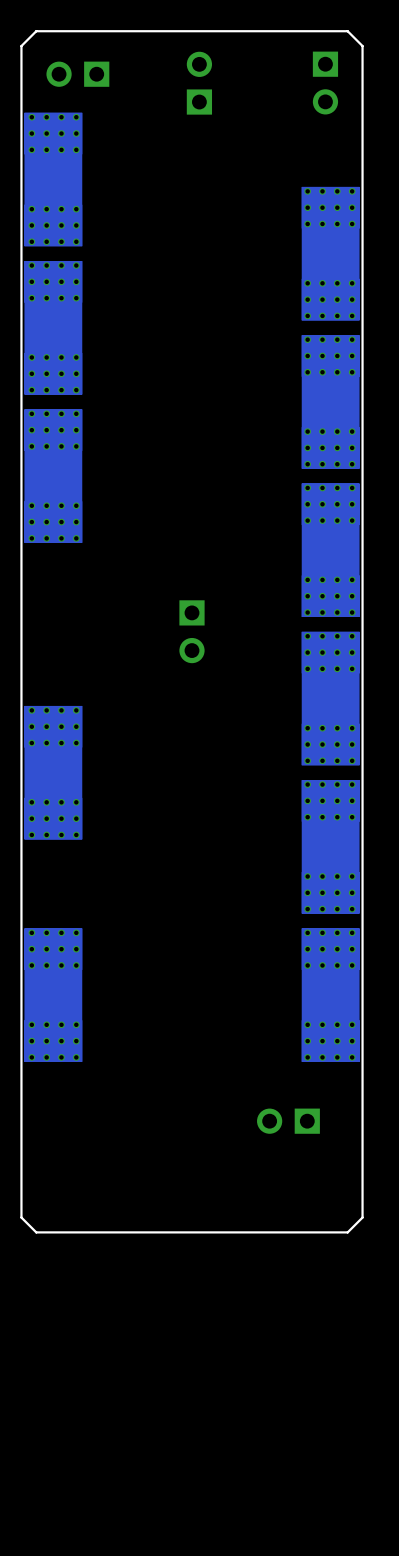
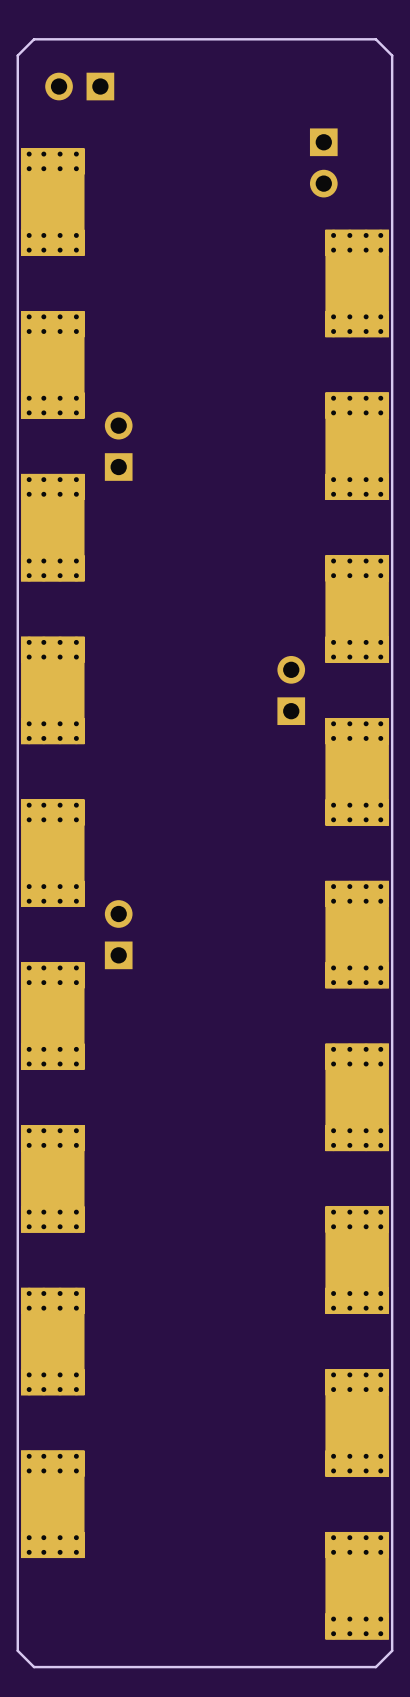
part: (199, 83) -> none
part: (325, 83) -> none
part footprint: [24, 112, 83, 247] -> [21, 148, 85, 256]
part: none -> (323, 162)
part footprint: [301, 186, 360, 321] -> [325, 229, 389, 338]
part footprint: [24, 261, 83, 395] -> [21, 311, 85, 419]
part footprint: [301, 335, 360, 469] -> [325, 392, 389, 500]
part: none -> (118, 446)
part footprint: [24, 409, 83, 543] -> [21, 473, 85, 582]
part footprint: [301, 483, 360, 617] -> [325, 555, 389, 663]
part: none -> (52, 690)
part rotation: 0° (192, 631) -> 180° (291, 690)
part position: (192, 631) -> (291, 690)
part footprint: [301, 631, 360, 766] -> [325, 718, 389, 826]
part footprint: [24, 705, 83, 840] -> [21, 799, 85, 907]
part footprint: [301, 780, 360, 914] -> [325, 880, 389, 989]
part: none -> (118, 934)
part: none -> (52, 1015)
part footprint: [301, 928, 360, 1062] -> [325, 1043, 389, 1152]
part: (53, 995) -> none
part: none -> (52, 1178)
part: (288, 1121) -> none
part: none -> (357, 1260)
part: none -> (52, 1341)
board edge: (362, 1217) (347, 1232) (36, 1232) (21, 1217) -> (392, 1341) (392, 1650) (375, 1667) (34, 1667) (17, 1650) (17, 1341)
part: none -> (357, 1422)
part: none -> (52, 1504)
part: none -> (357, 1585)

